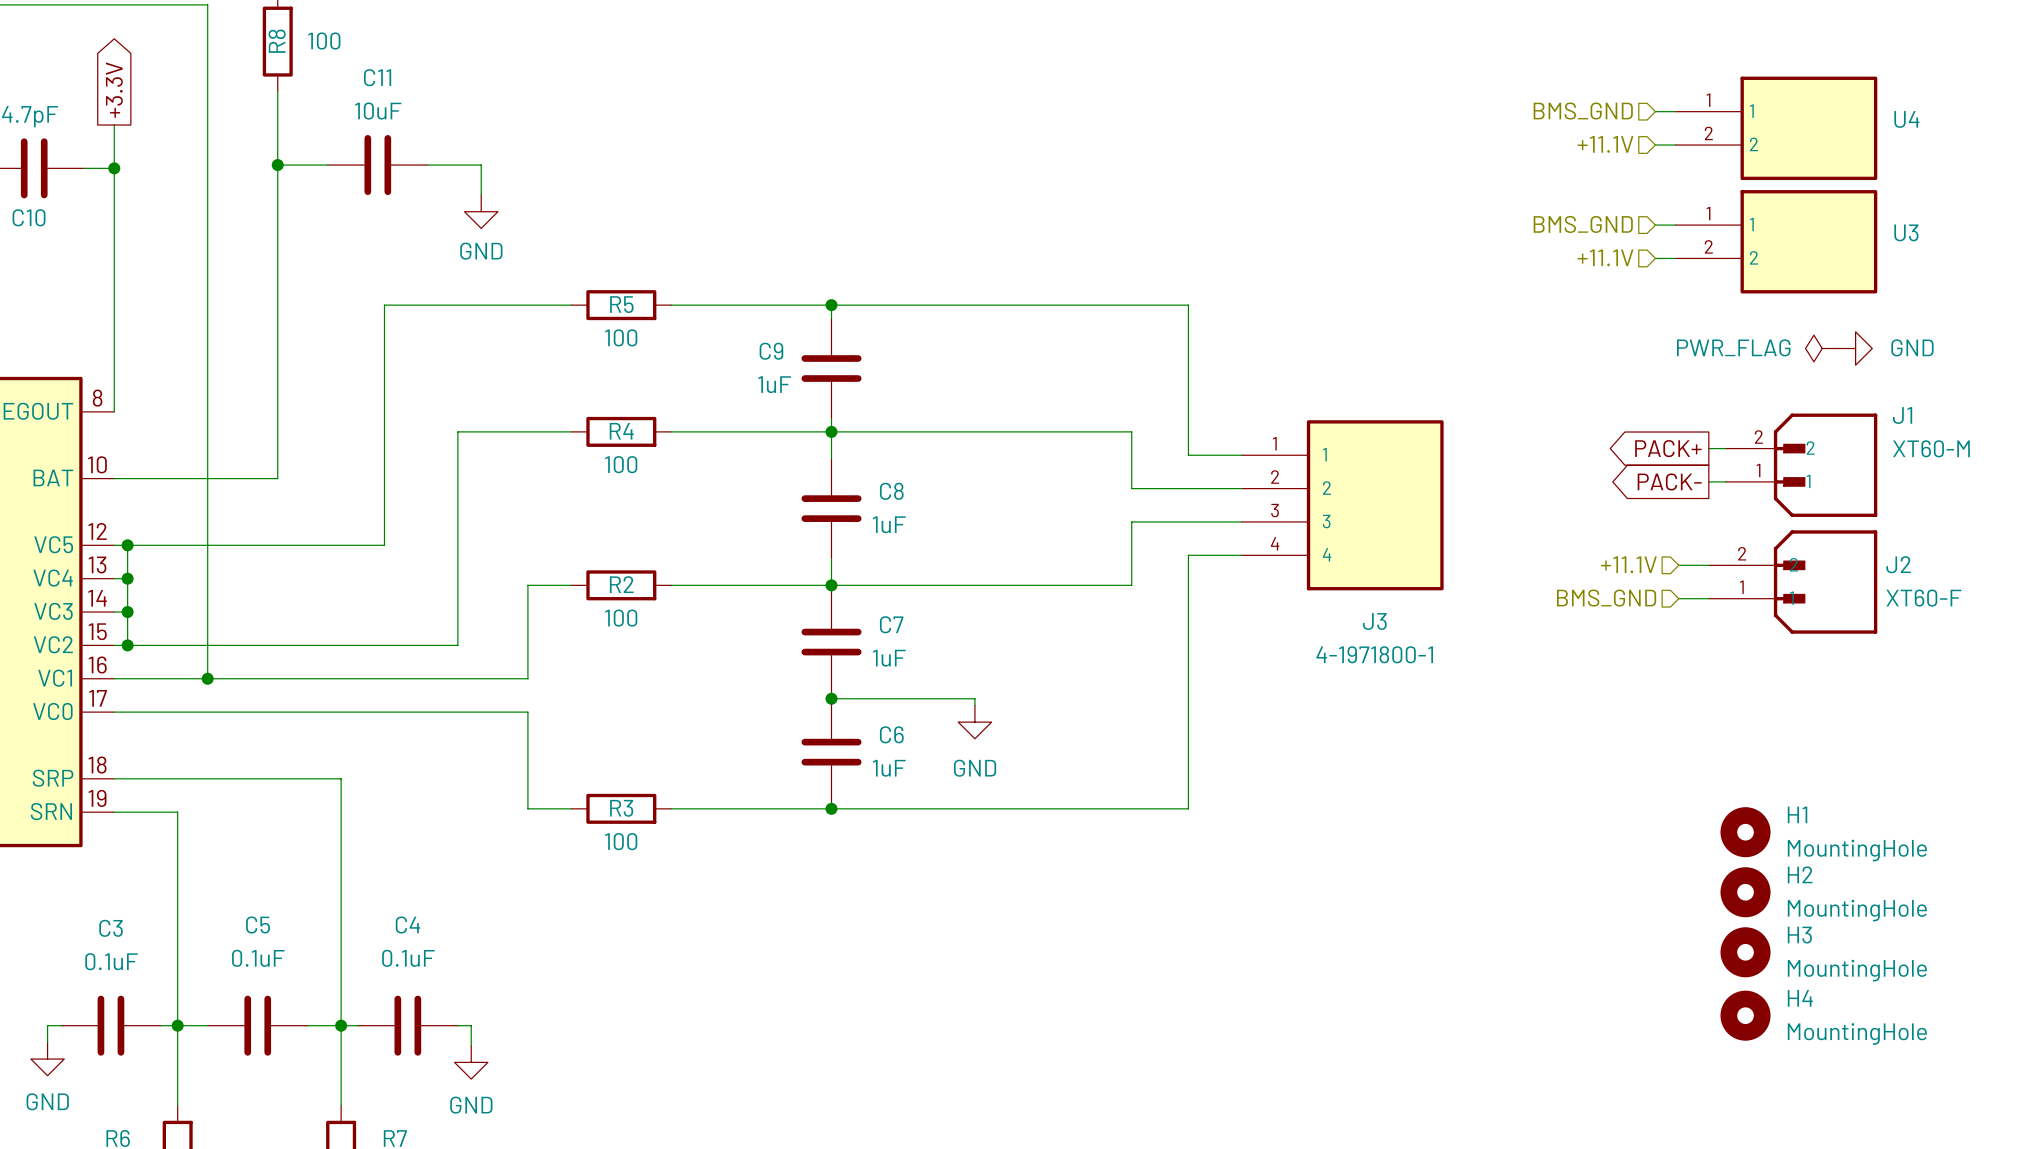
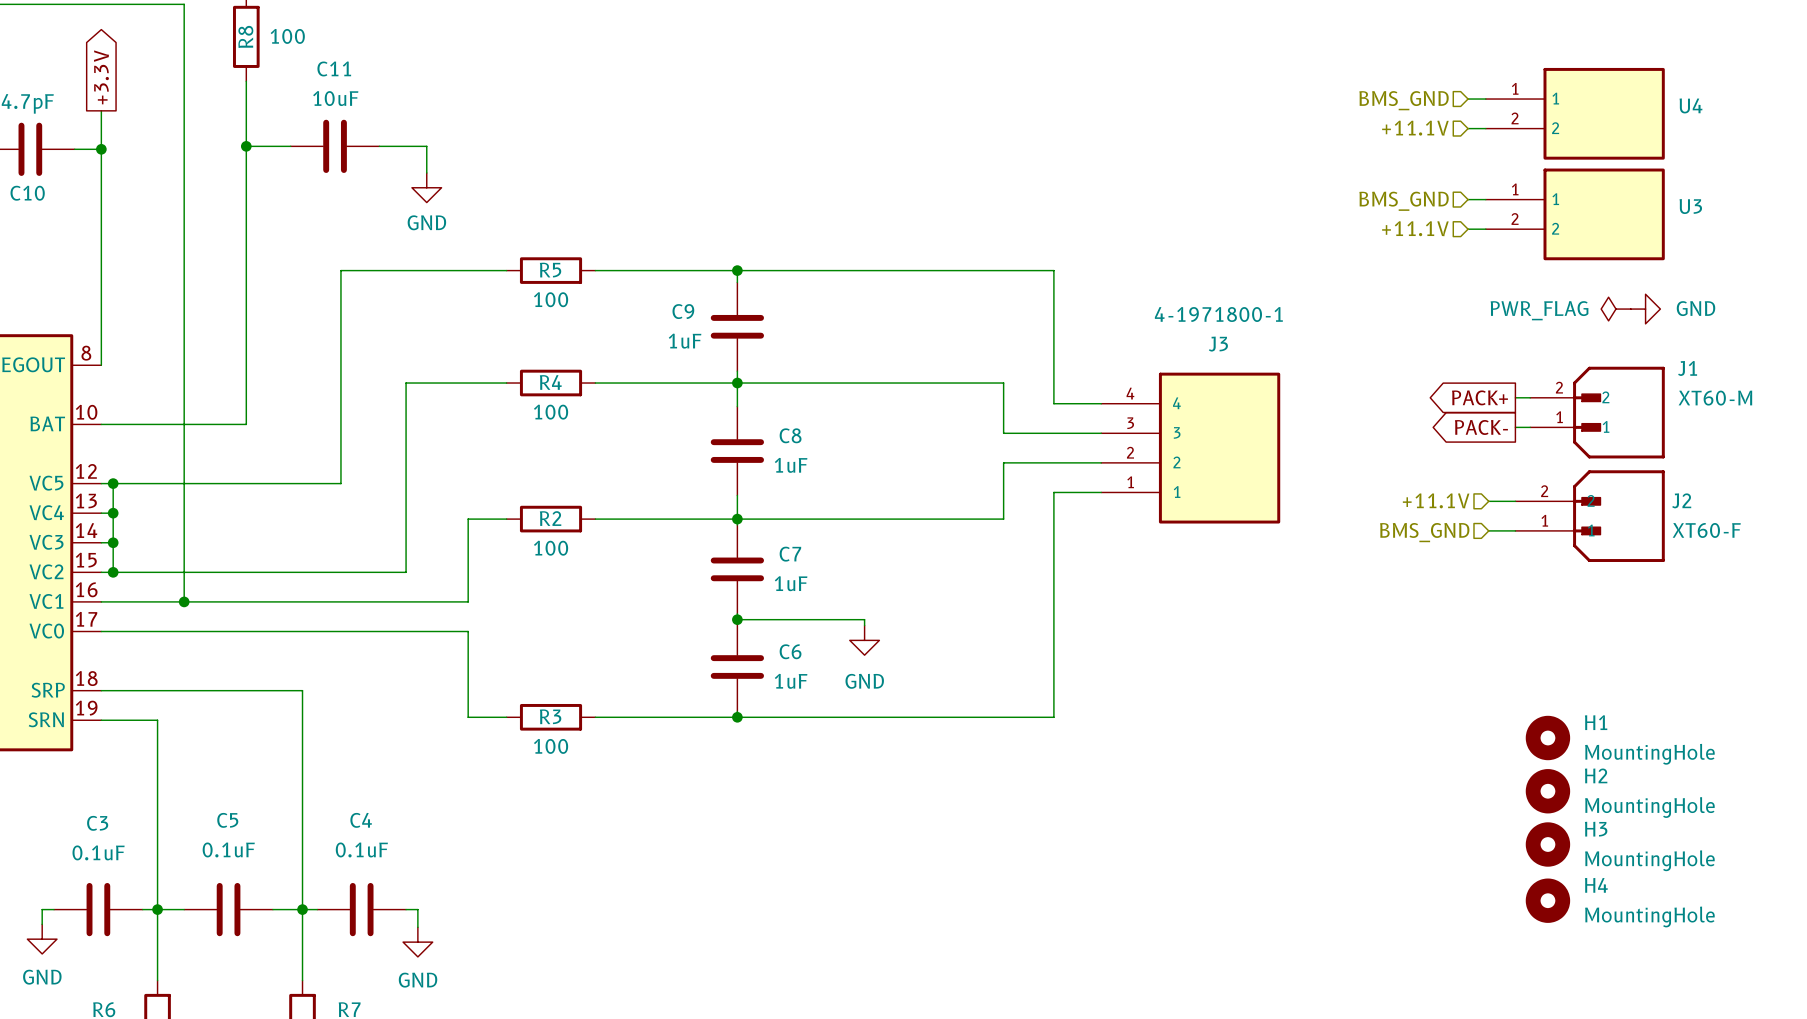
J3 flip: as is (1375, 505) -> up-down (1219, 448)

